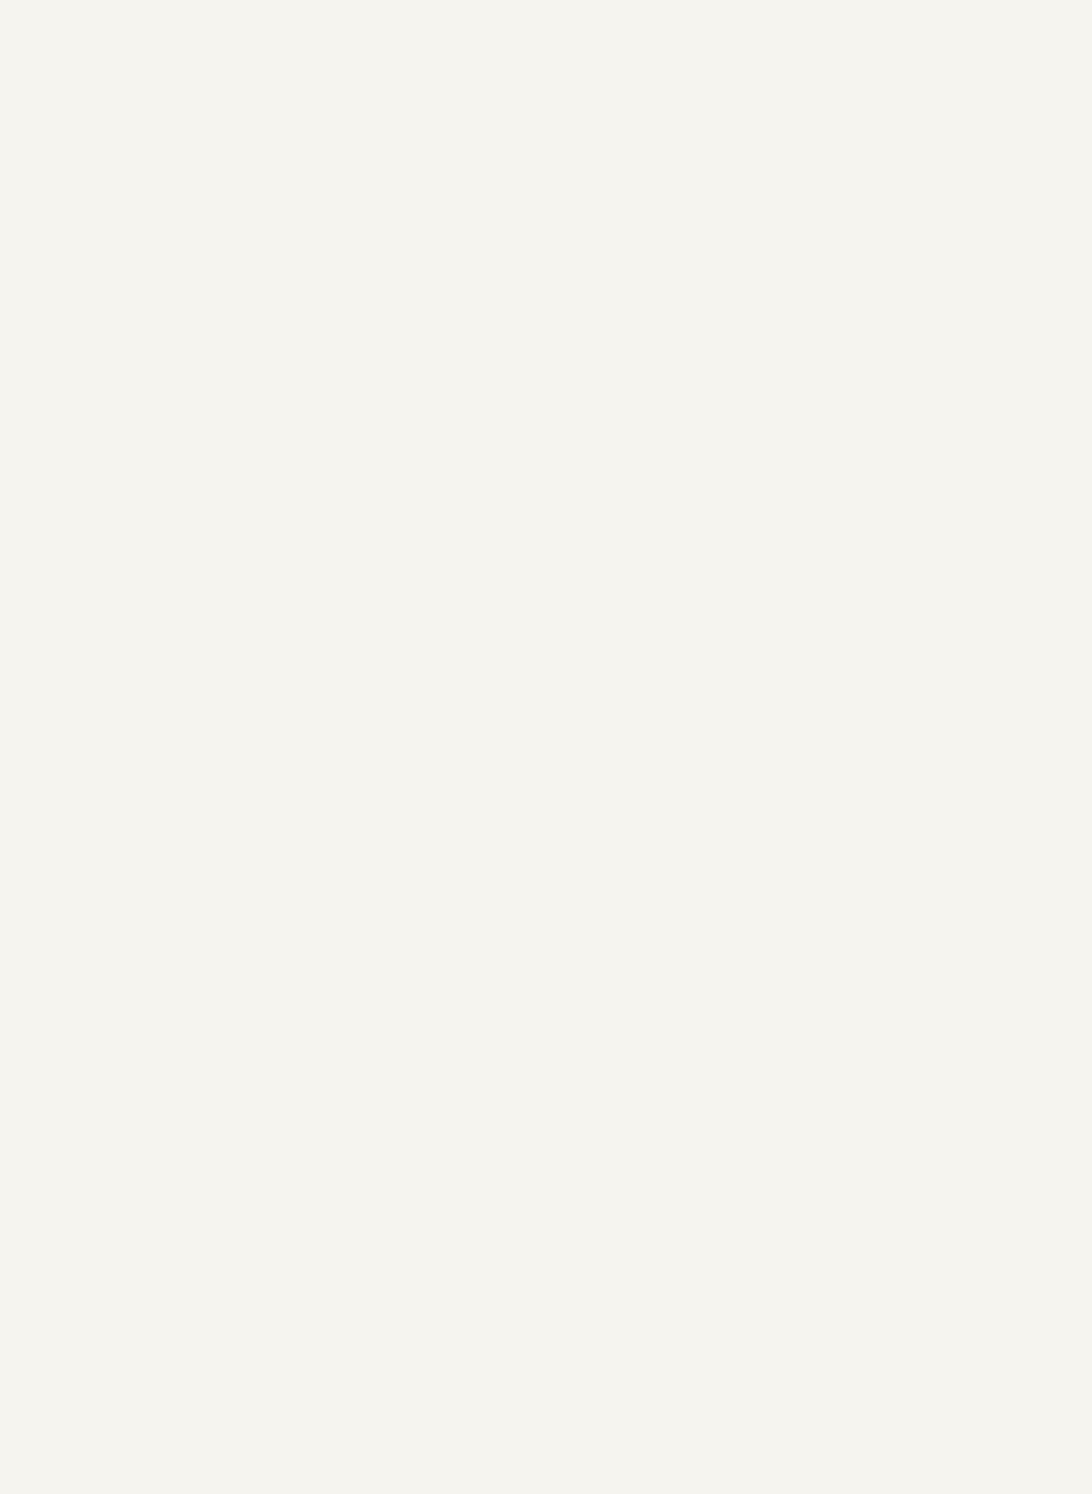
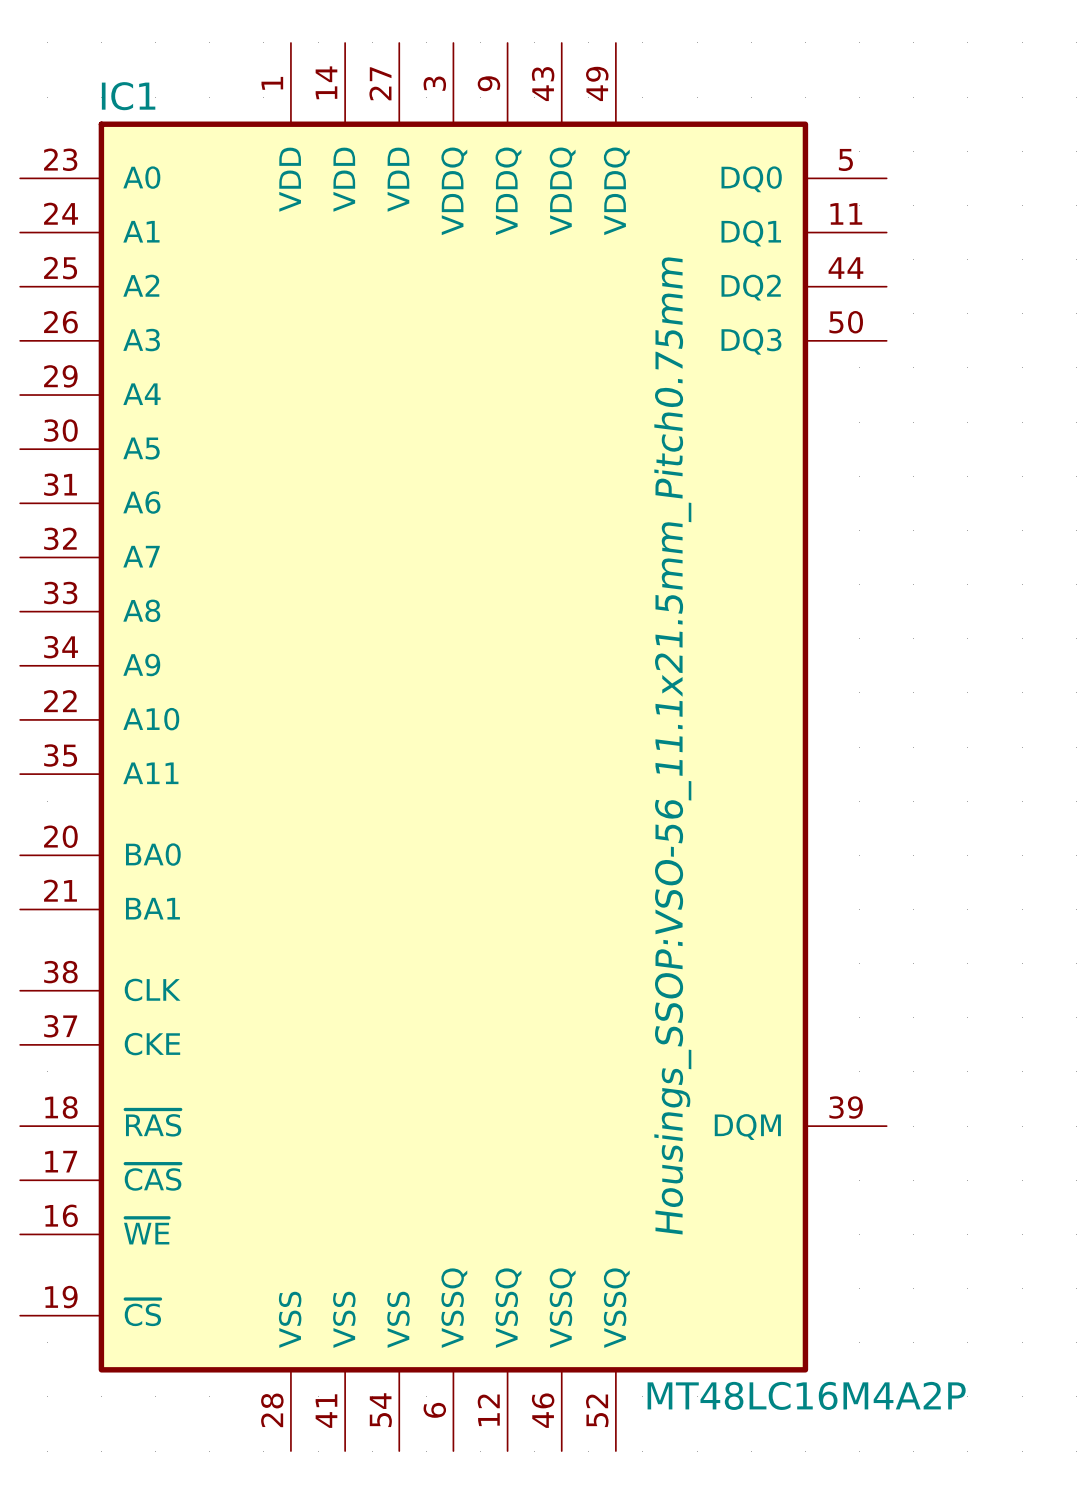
IC1: none -> MT48LC16M4A2P (453, 747)

